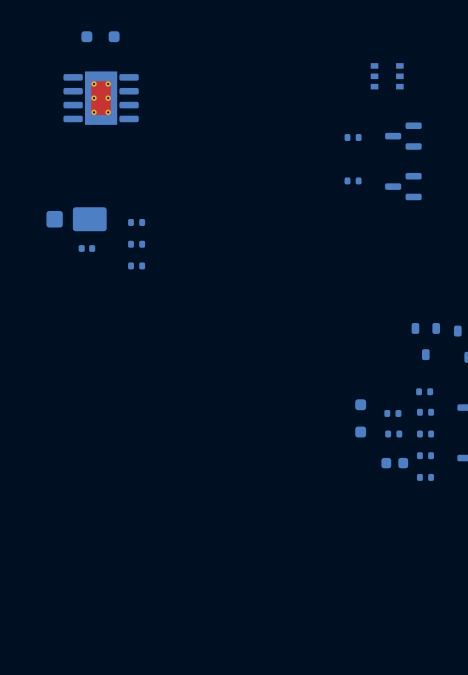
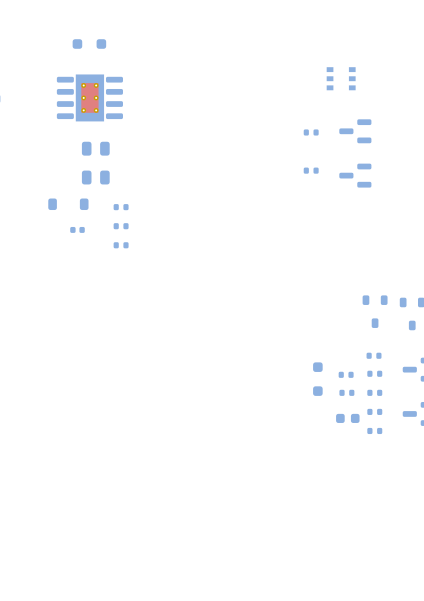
part: none -> (95, 148)
part: none -> (95, 177)
part footprint: [46, 207, 107, 232] -> [48, 198, 89, 211]

